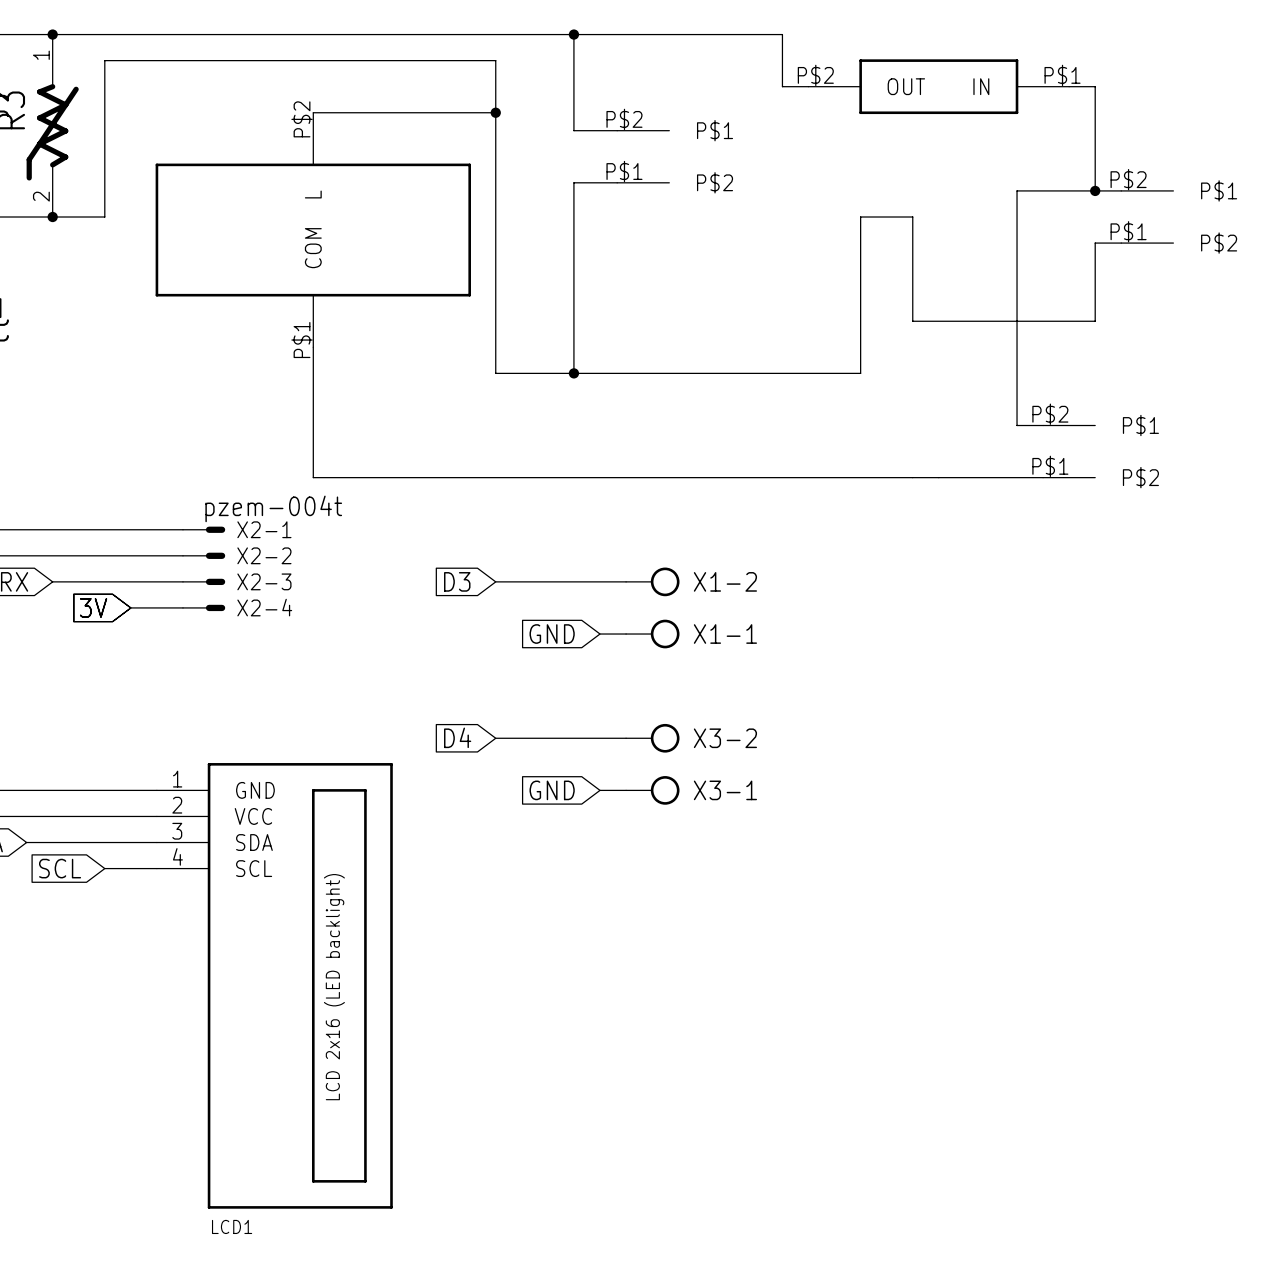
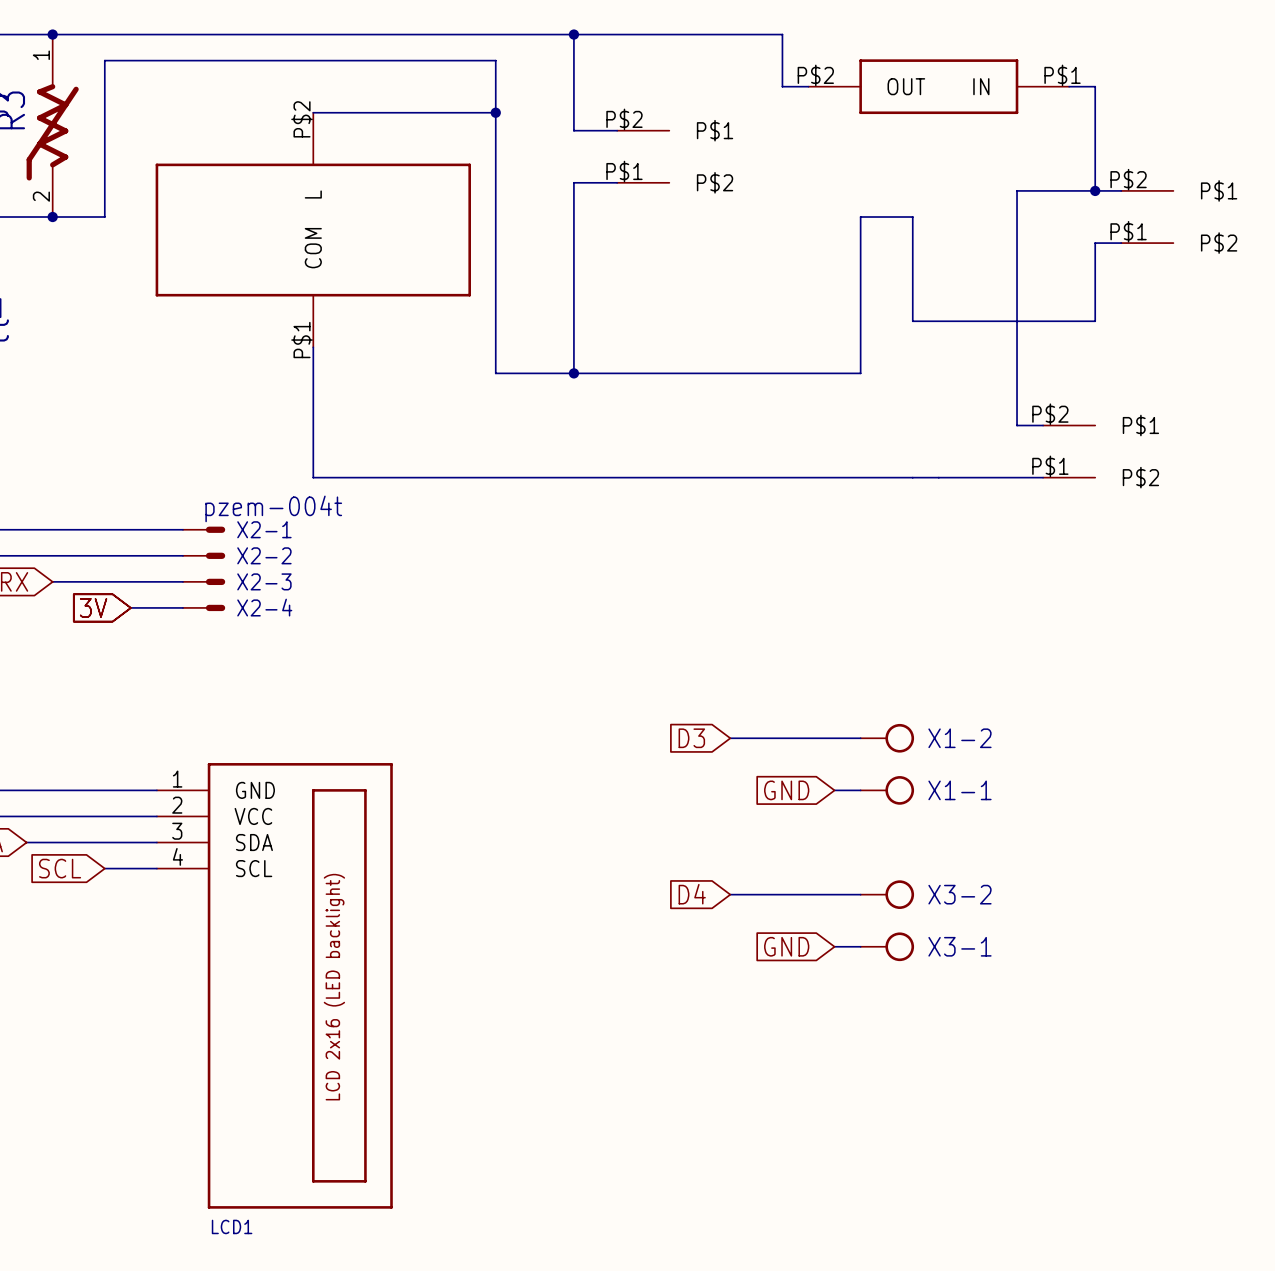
global label: D3 (457, 581) -> none
wire: (495, 581) (626, 581) -> none
X1-2 position: (652, 581) -> (887, 738)
global label: GND (552, 634) -> none
wire: (600, 634) (626, 634) -> none
X1-1 position: (652, 634) -> (887, 790)
global label: D4 (457, 737) -> none
wire: (495, 738) (626, 738) -> (730, 738) (860, 738)
X3-2 position: (652, 738) -> (887, 894)
global label: none -> D3 (691, 738)
global label: GND (552, 790) -> none
wire: (600, 790) (626, 790) -> (834, 790) (860, 790)
X3-1 position: (652, 790) -> (887, 946)
global label: none -> GND (786, 790)
global label: none -> D4 (692, 894)
wire: none -> (730, 894) (860, 894)
global label: none -> GND (786, 946)
wire: none -> (834, 946) (860, 946)

